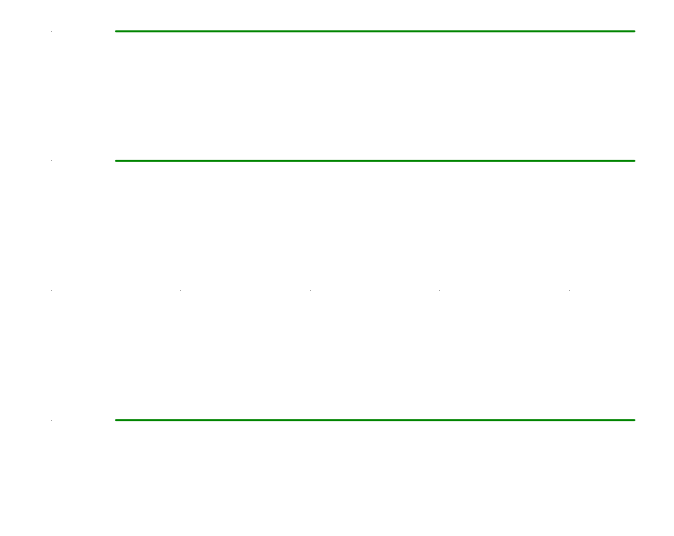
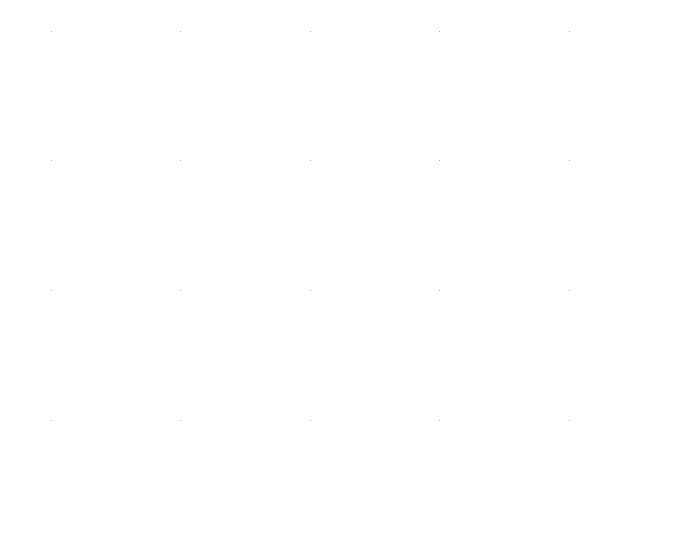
wire: (115, 31) (634, 31) -> none
wire: (115, 160) (634, 160) -> none
wire: (115, 420) (634, 420) -> none

